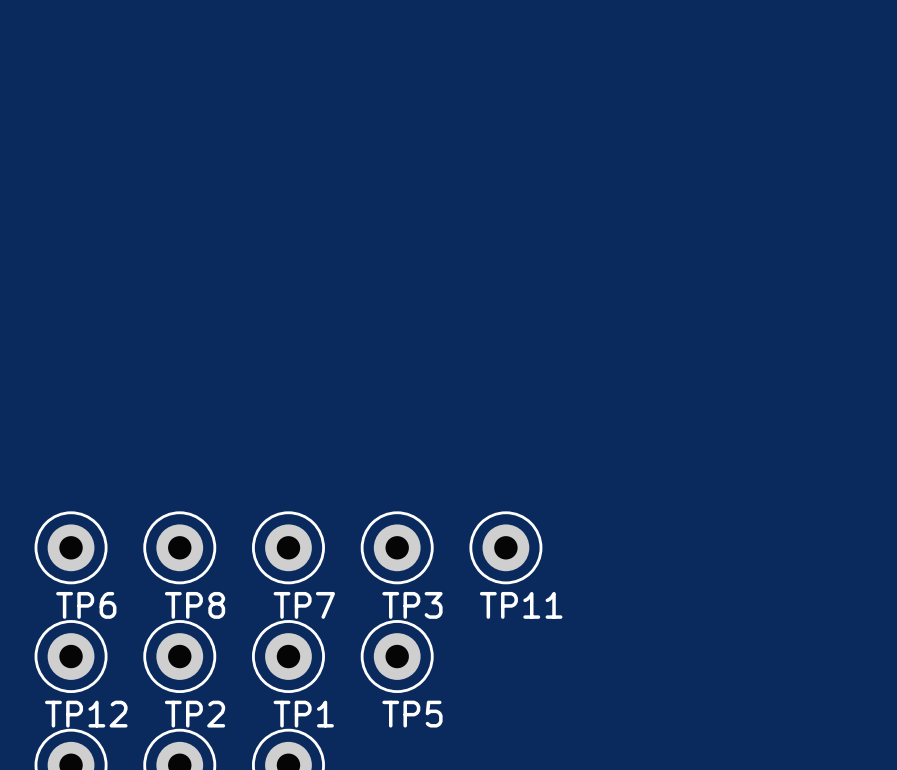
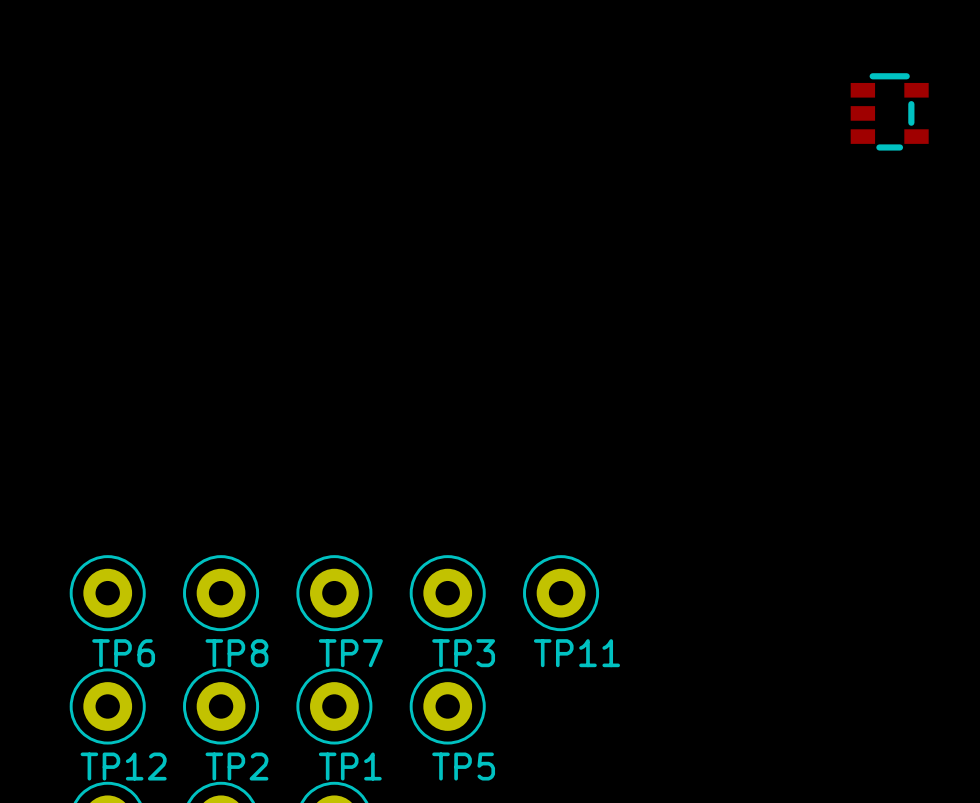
part: none -> (889, 111)

